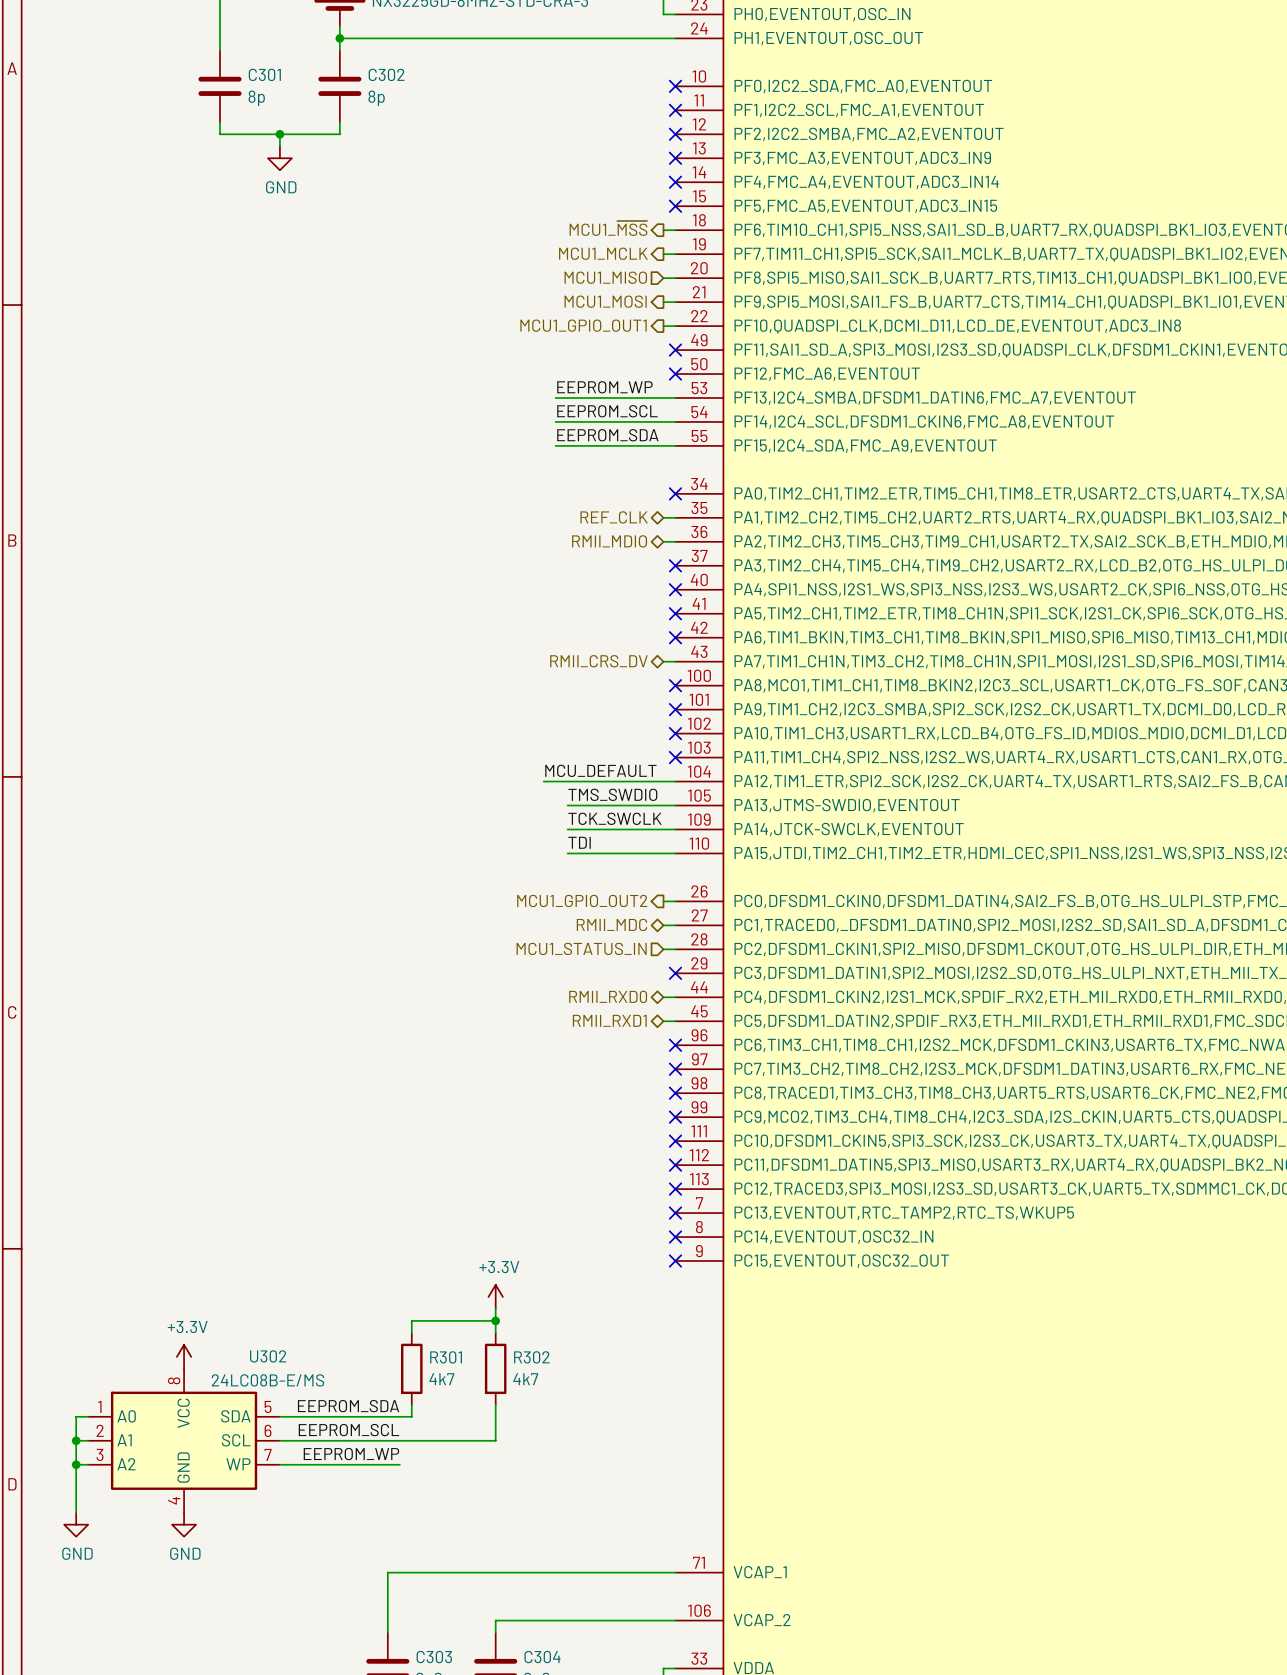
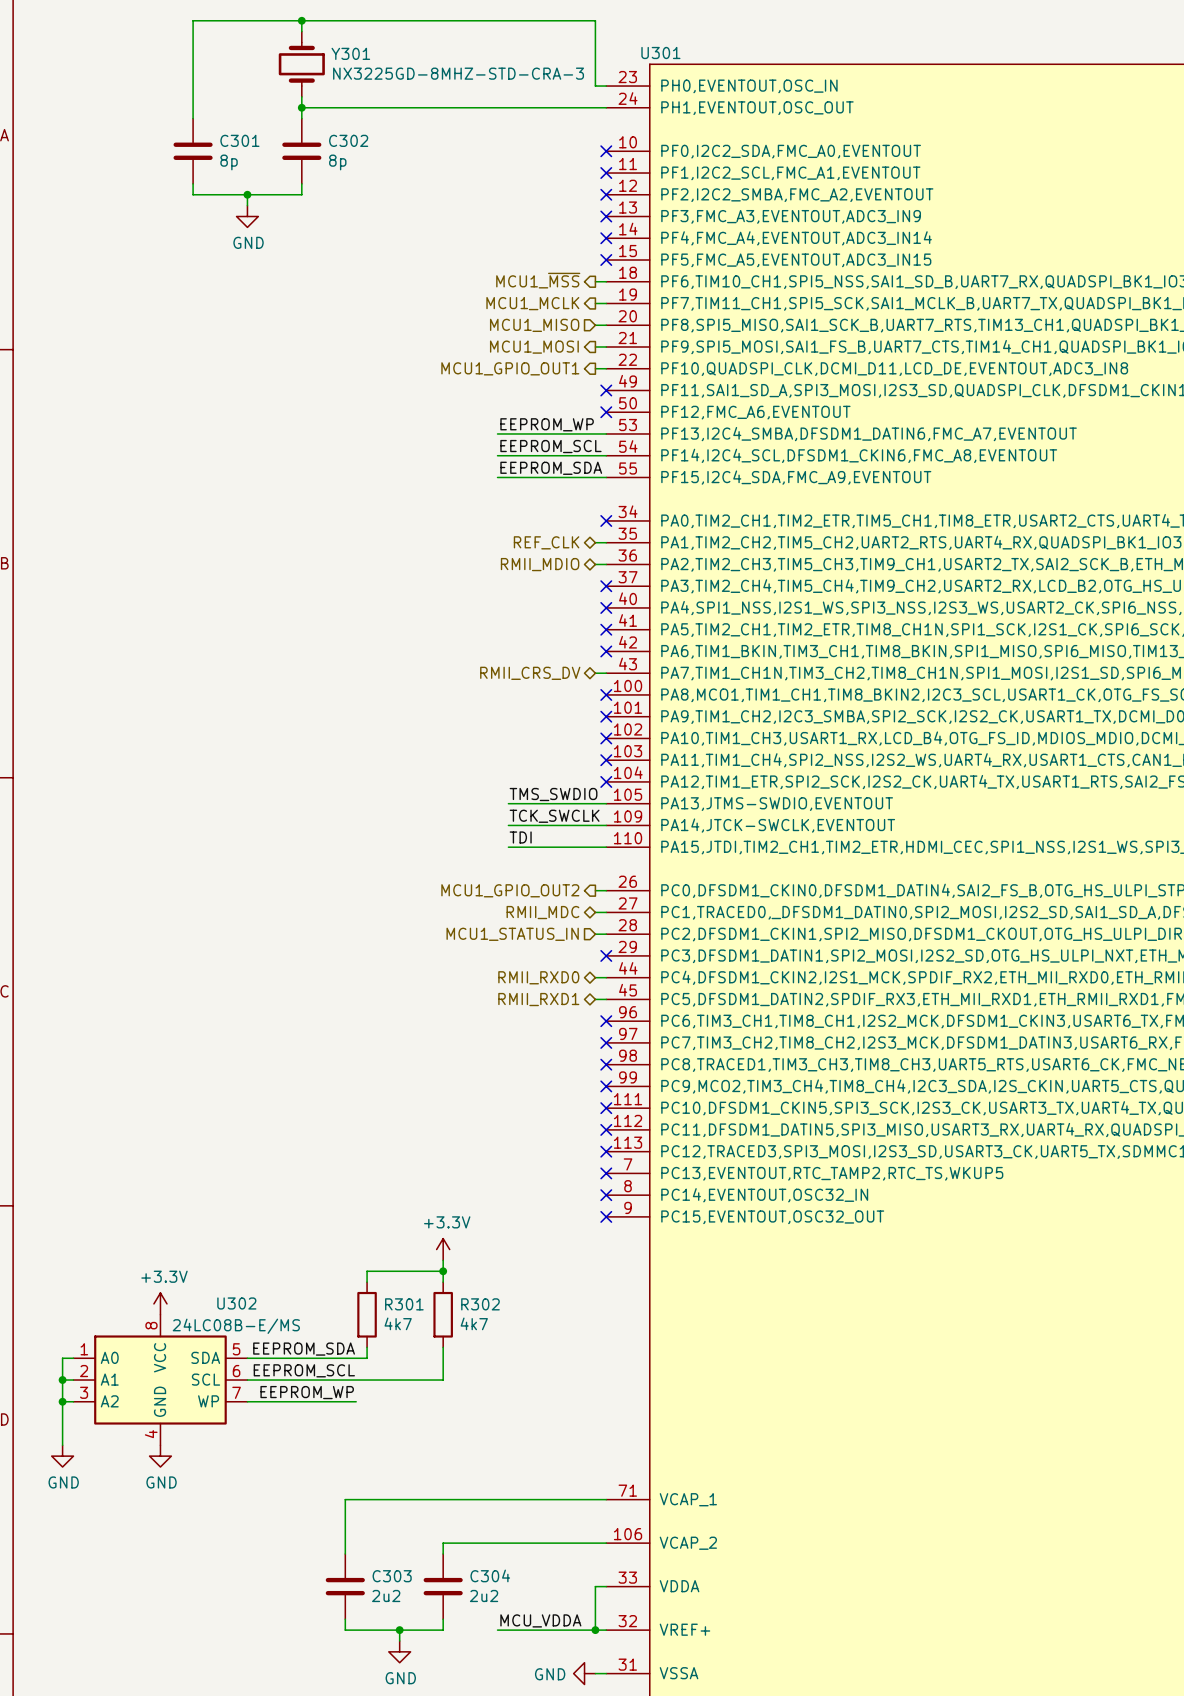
label: MCU_DEFAULT (600, 770) -> none
wire: (543, 781) (675, 781) -> none
no-connect mark: none -> (606, 781)

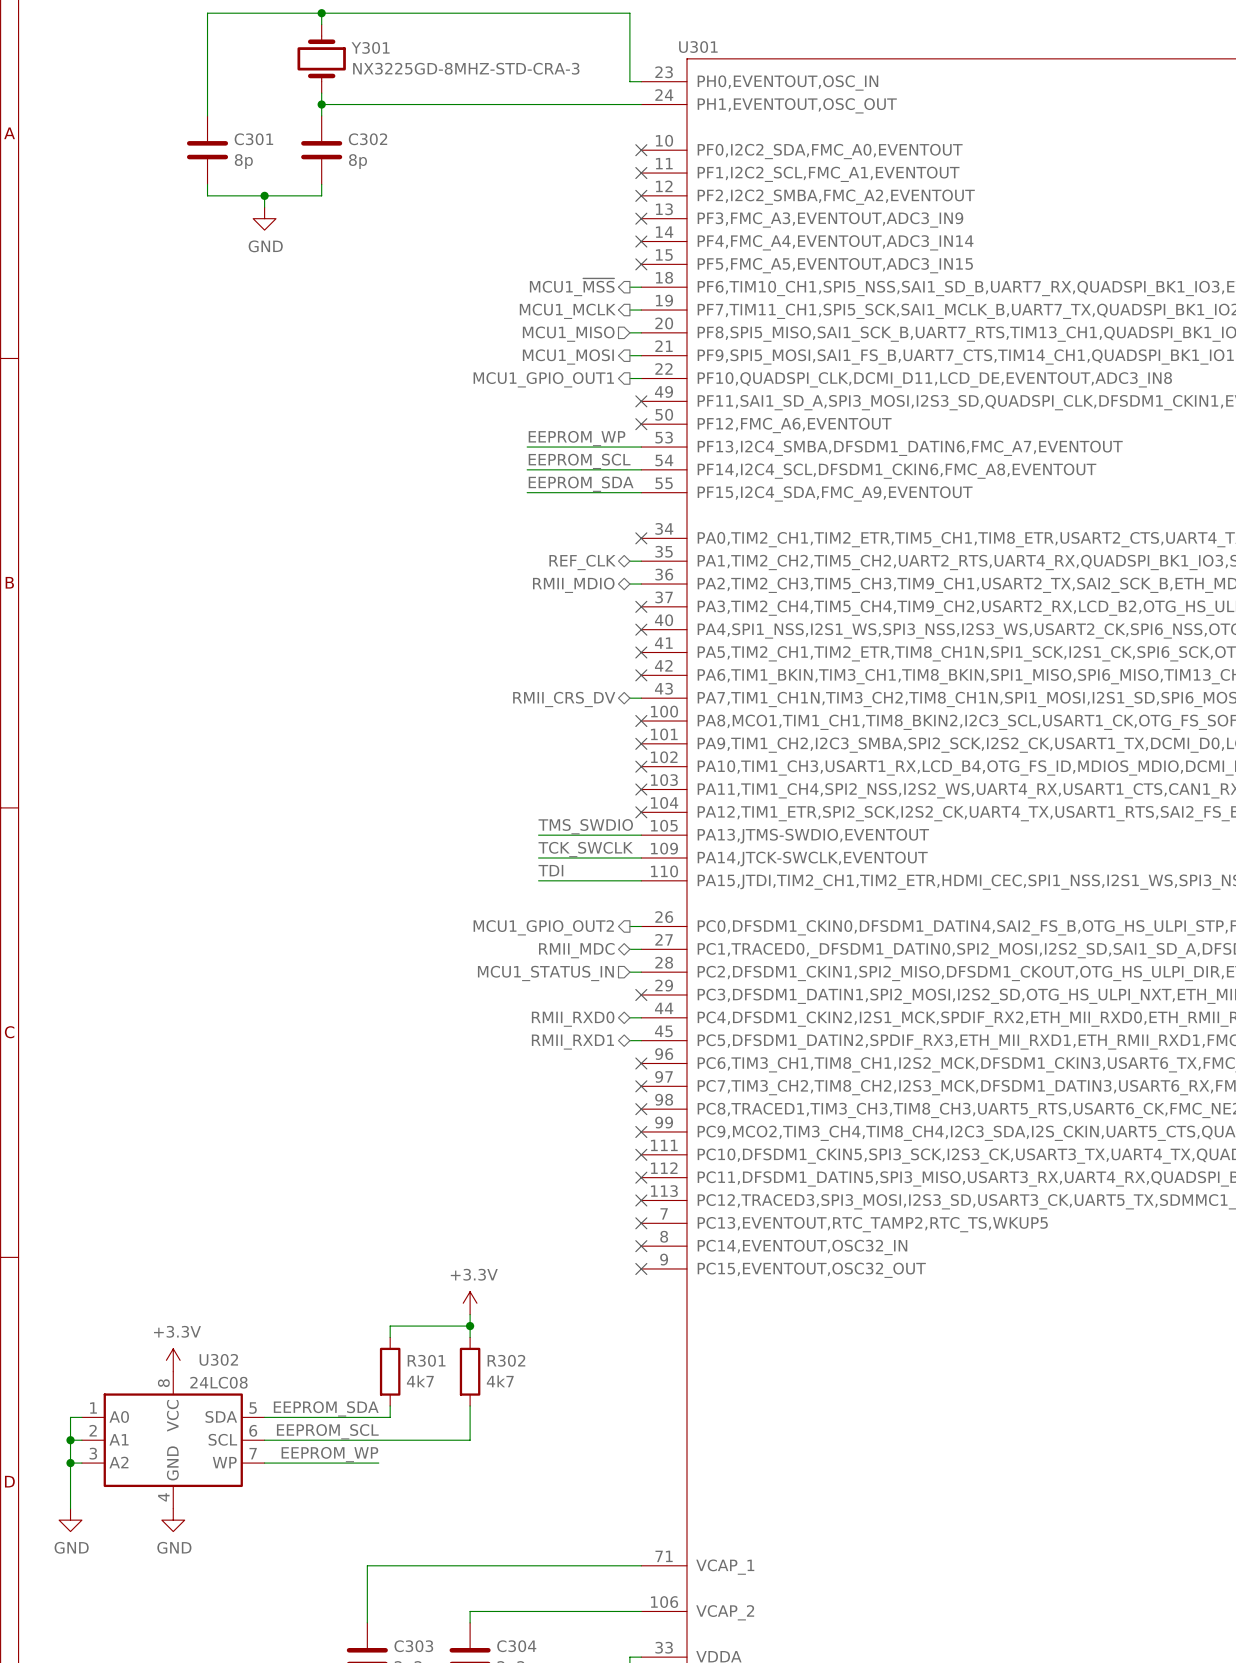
U302 name position: U302 (236, 1303) -> U302 (218, 1359)
U302 value: 24LC08B-E/MS (236, 1326) -> 24LC08 (218, 1382)

